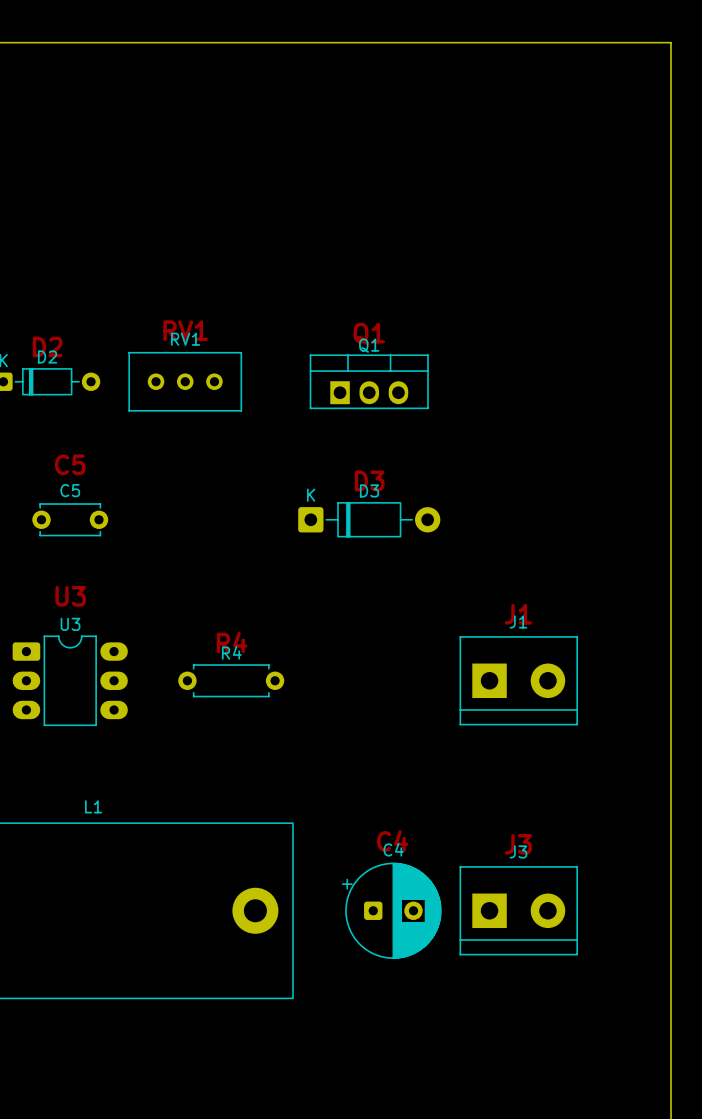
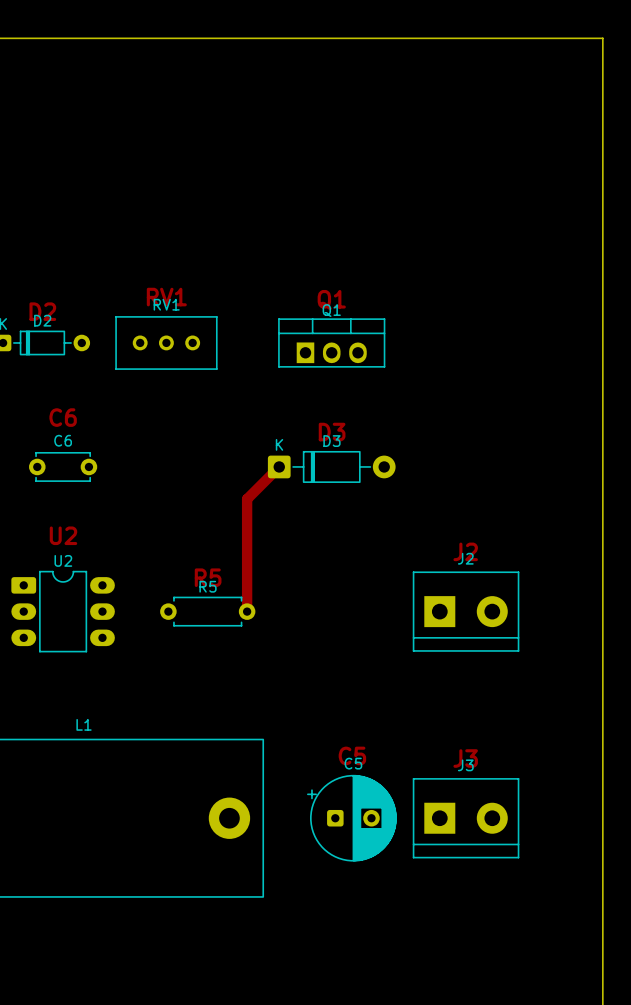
text: C5 (70, 464) -> C6 (63, 417)
C5 name: C5 (70, 490) -> C6 (63, 440)
track: none -> (279, 466) (247, 499) (247, 611)
text: U3 (70, 596) -> U2 (63, 535)
text: J1 (518, 614) -> J2 (465, 551)
J1 name: J1 (518, 621) -> J2 (465, 558)
U3 name: U3 (70, 624) -> U2 (63, 560)
text: R4 (232, 642) -> R5 (208, 577)
R4 name: R4 (231, 652) -> R5 (208, 586)
text: C4 (392, 841) -> C5 (352, 755)
C4 name: C4 (393, 849) -> C5 (353, 763)

